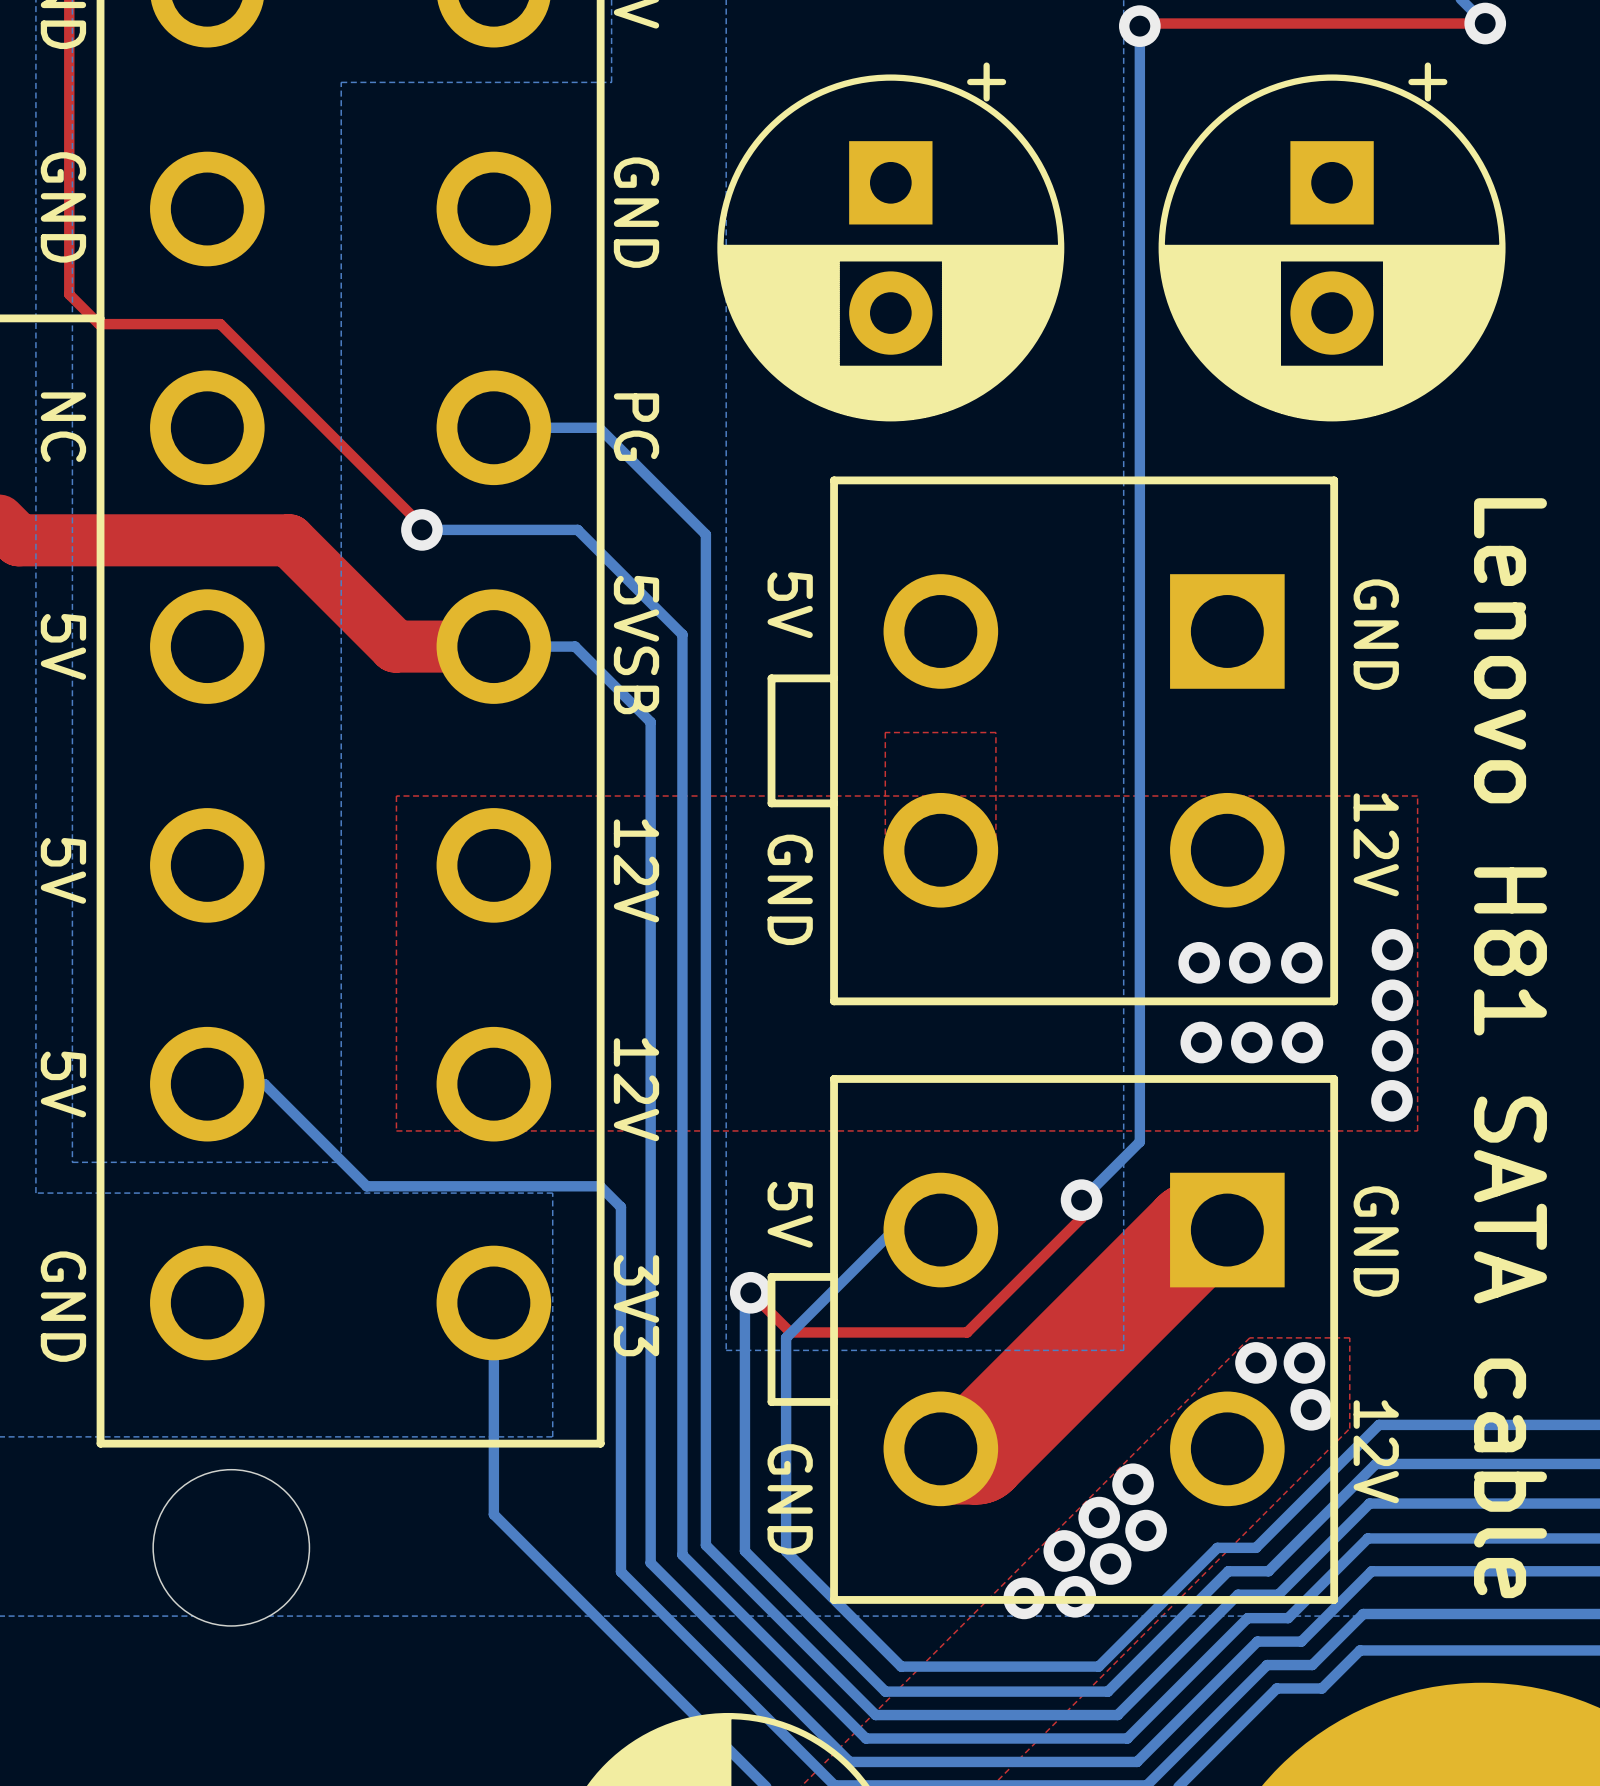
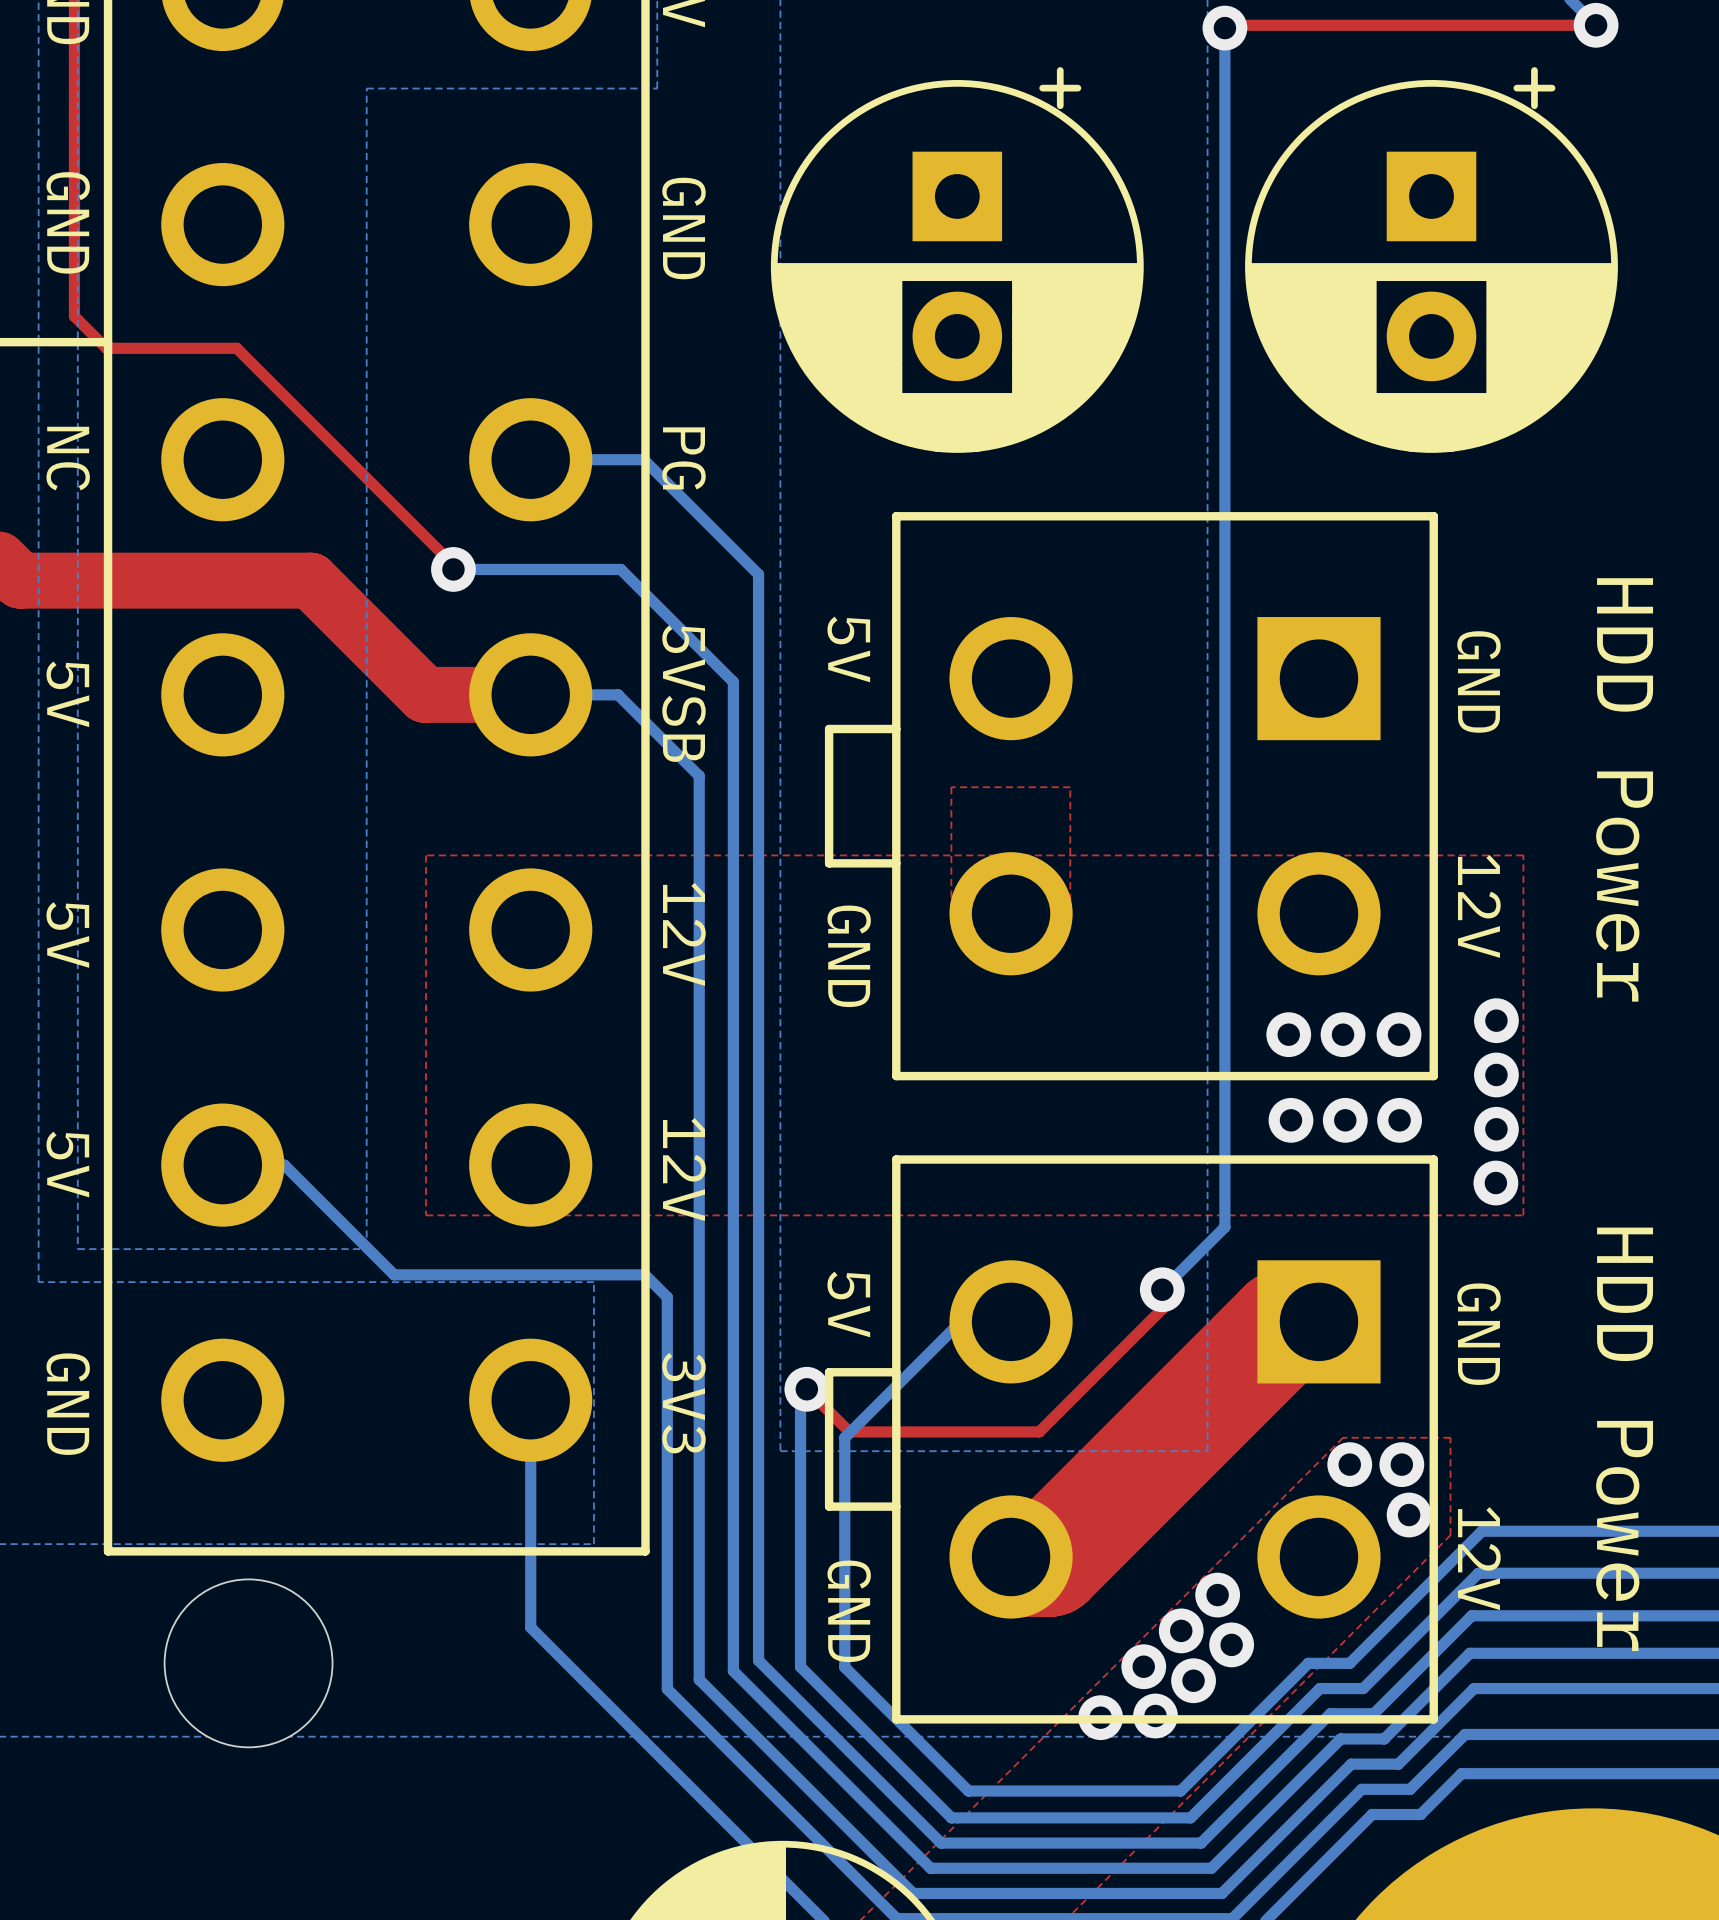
text: none -> HDD Power (1624, 789)
text: Lenovo H81 SATA cable (1510, 1048) -> none
text: none -> HDD Power (1624, 1439)

